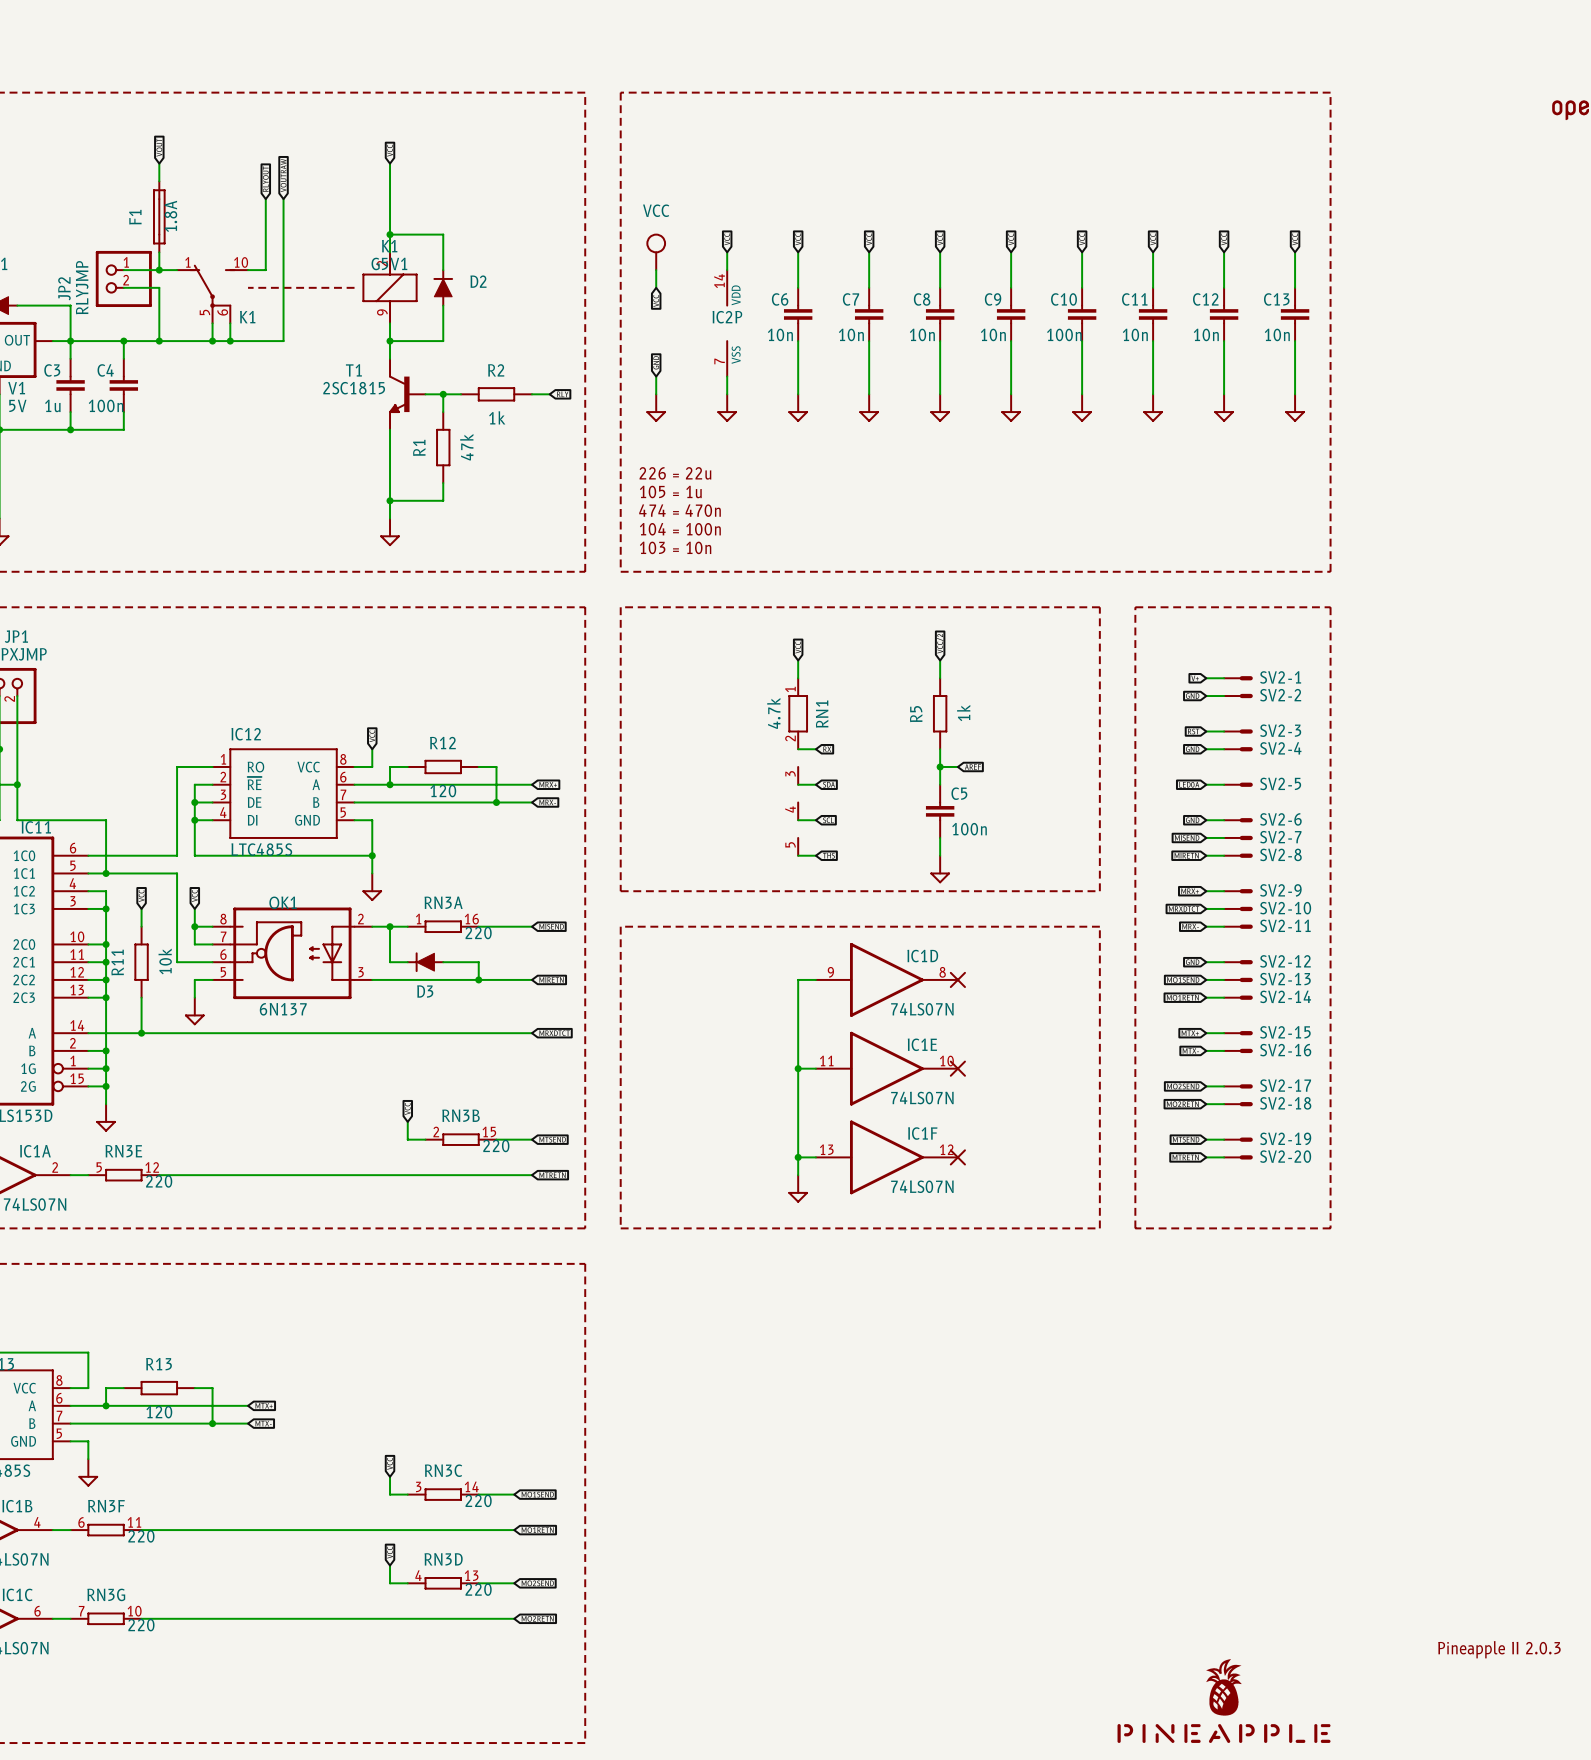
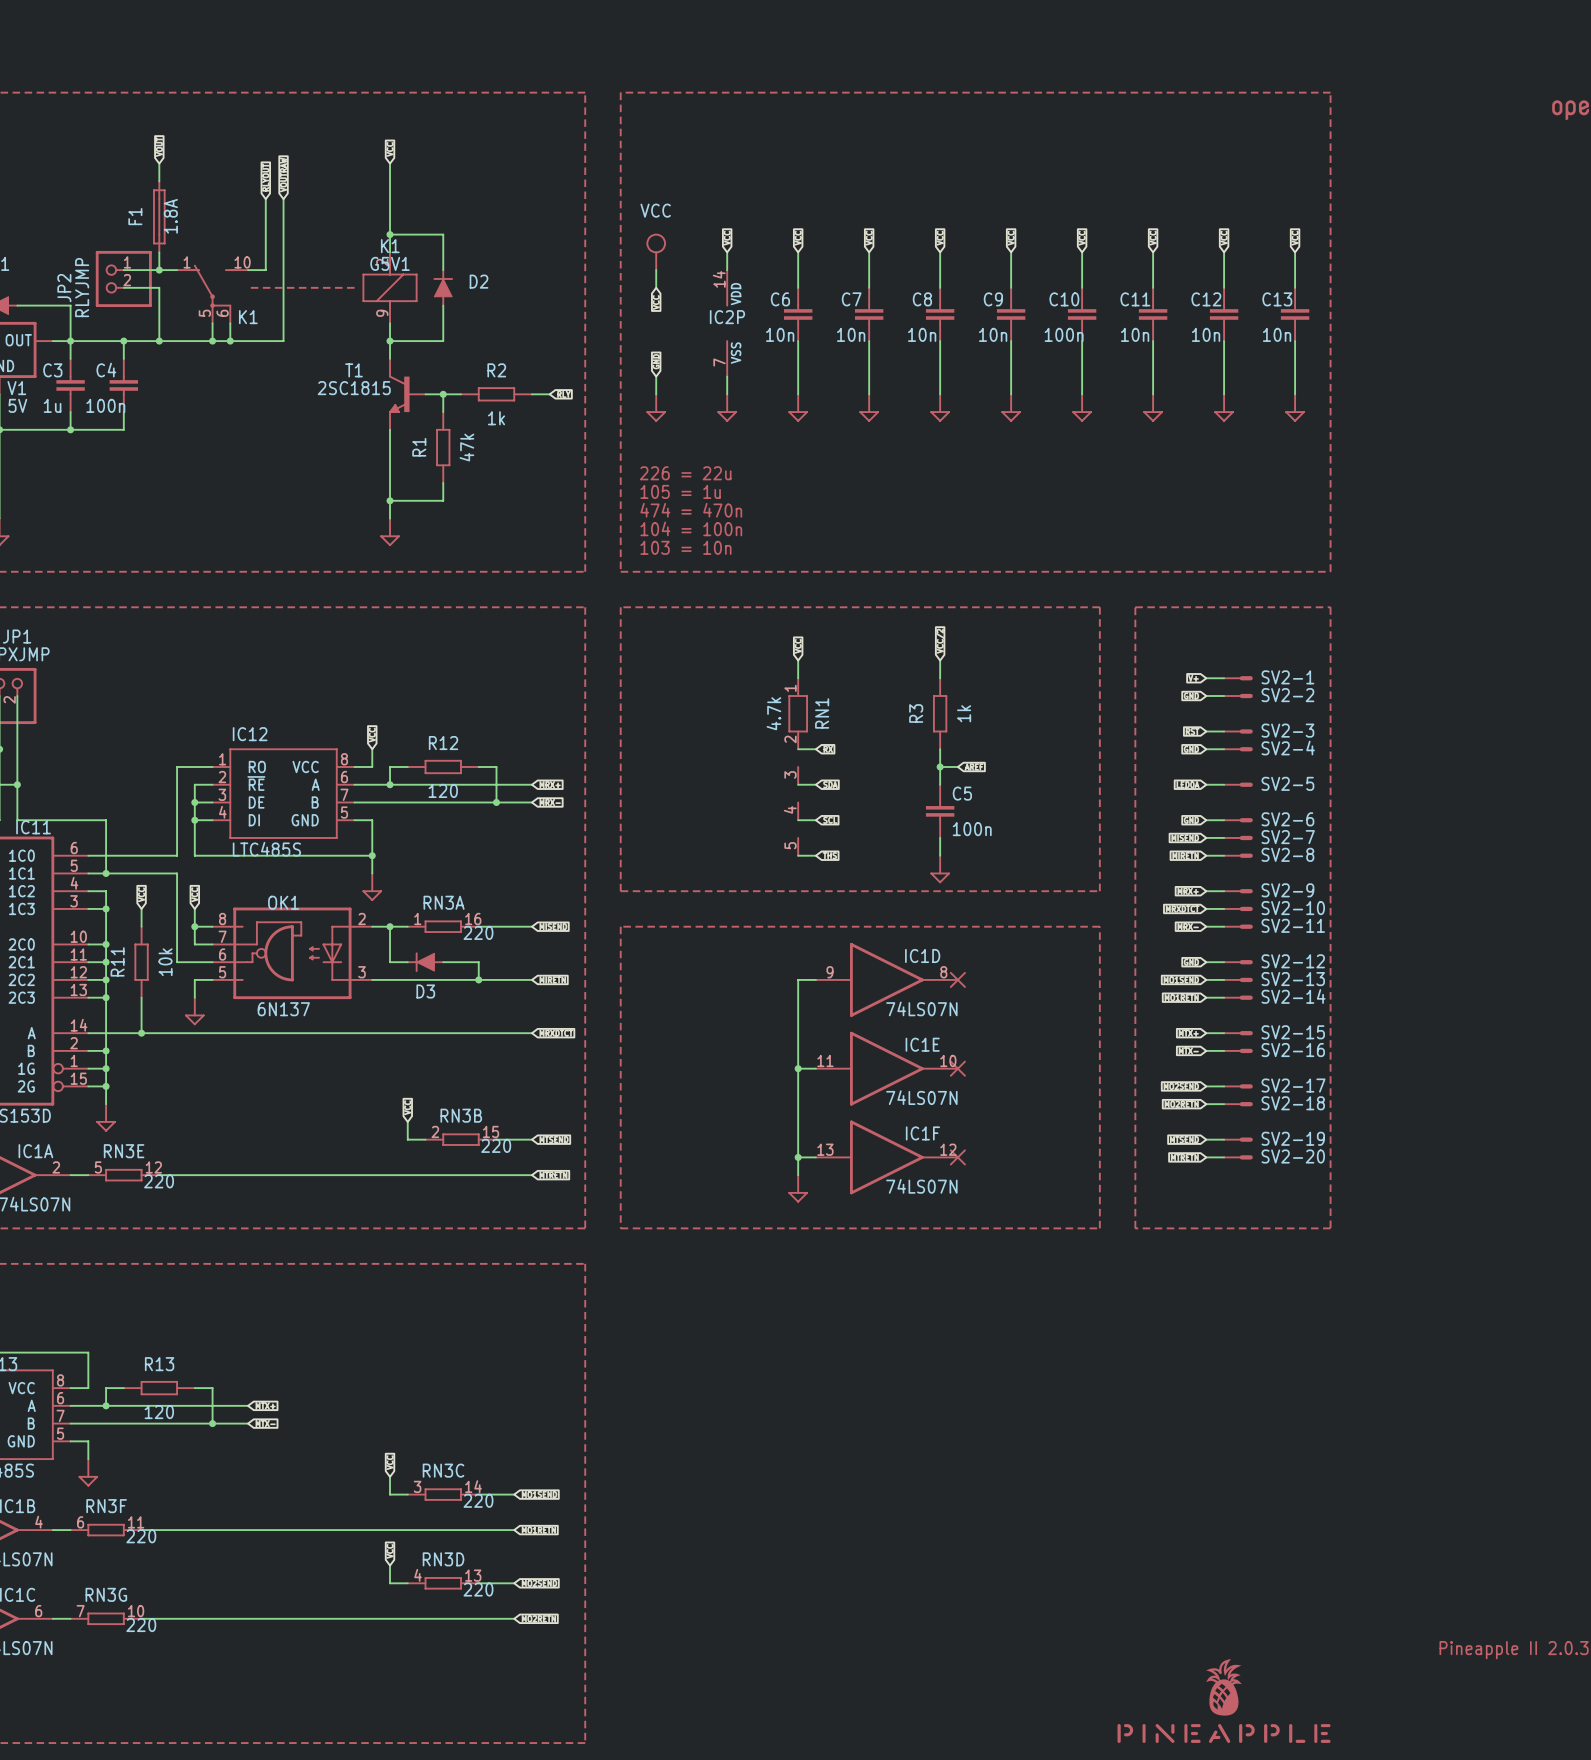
R5 name: R5 (916, 714) -> R3 (916, 713)

